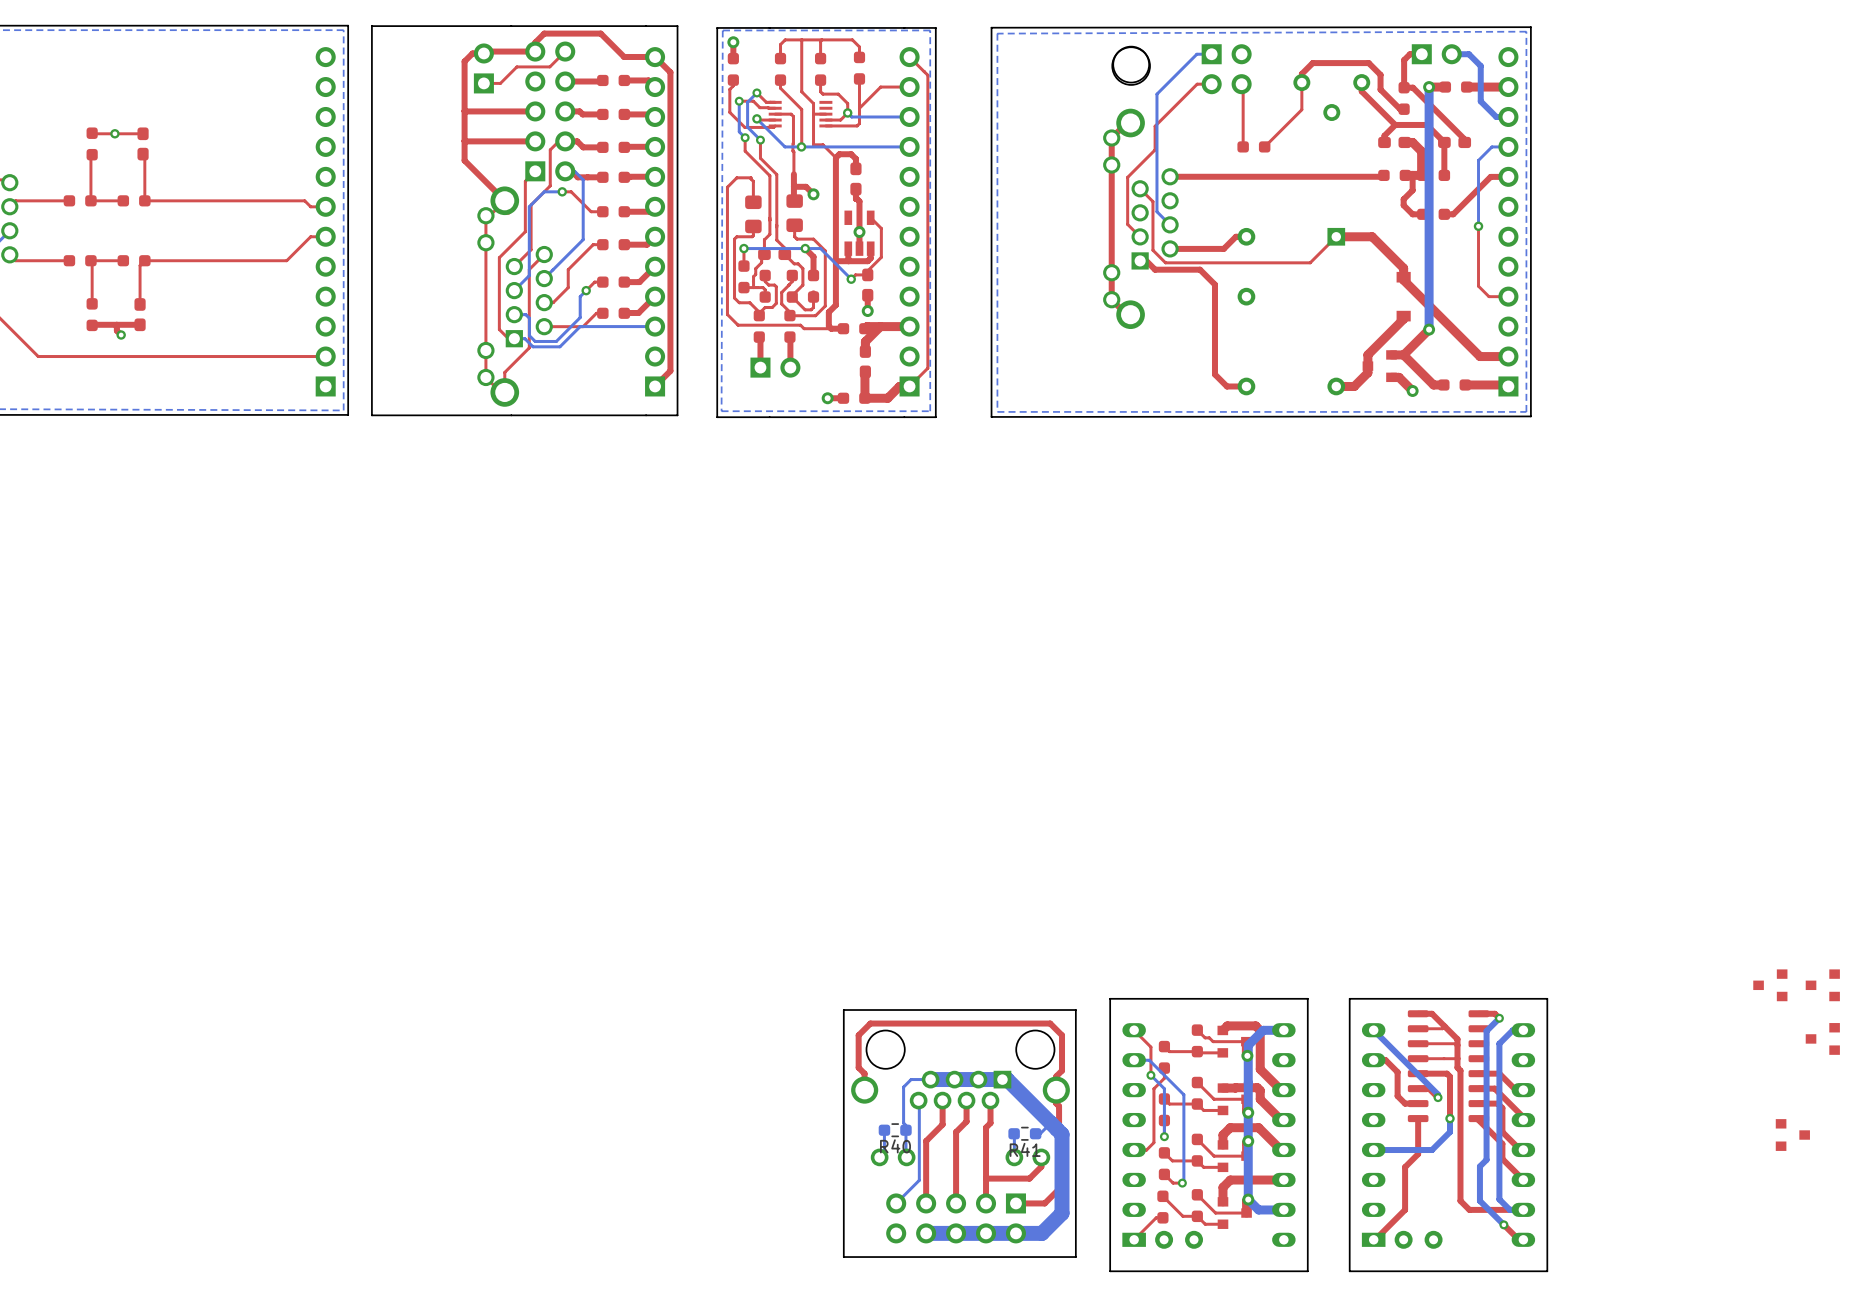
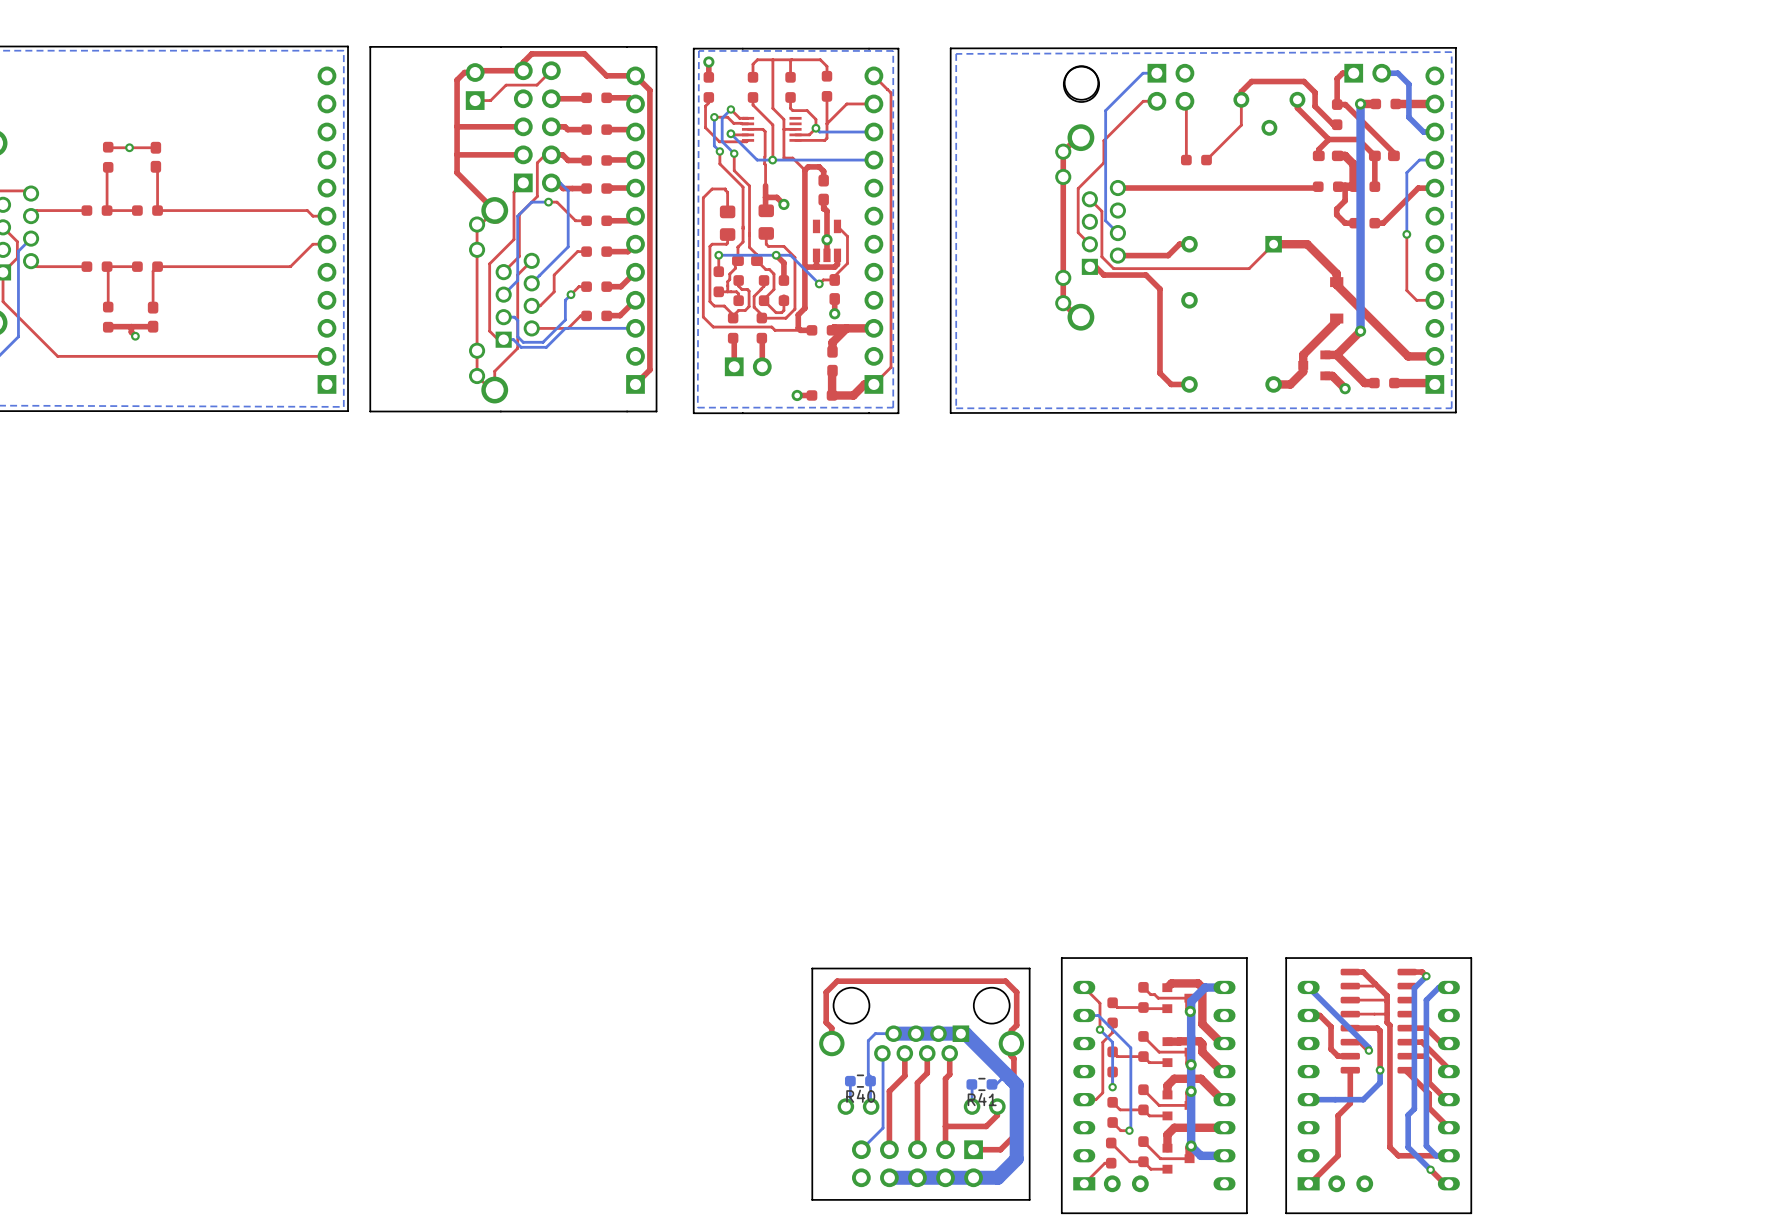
part: (1770, 985) -> none
part: (1822, 985) -> none
part: (1822, 1038) -> none
part: (1792, 1135) -> none

